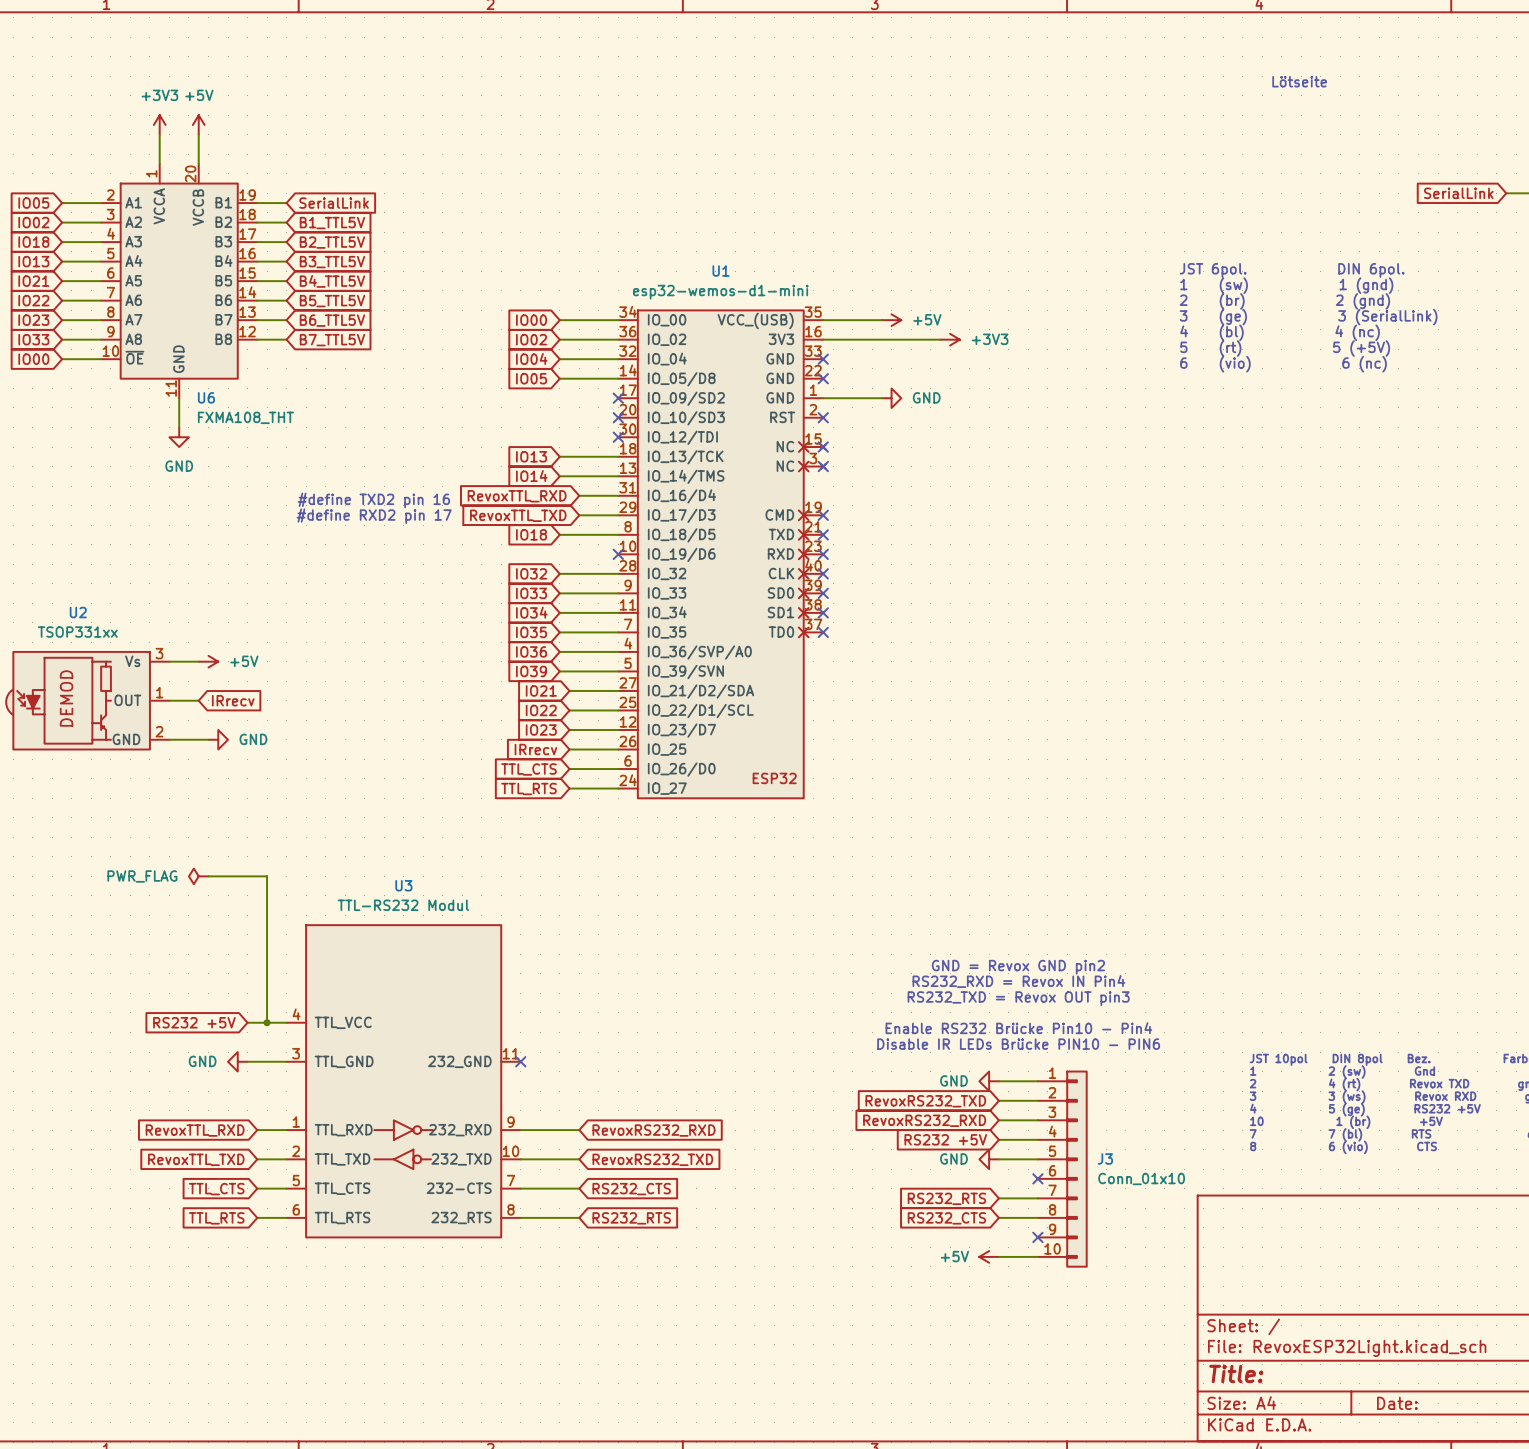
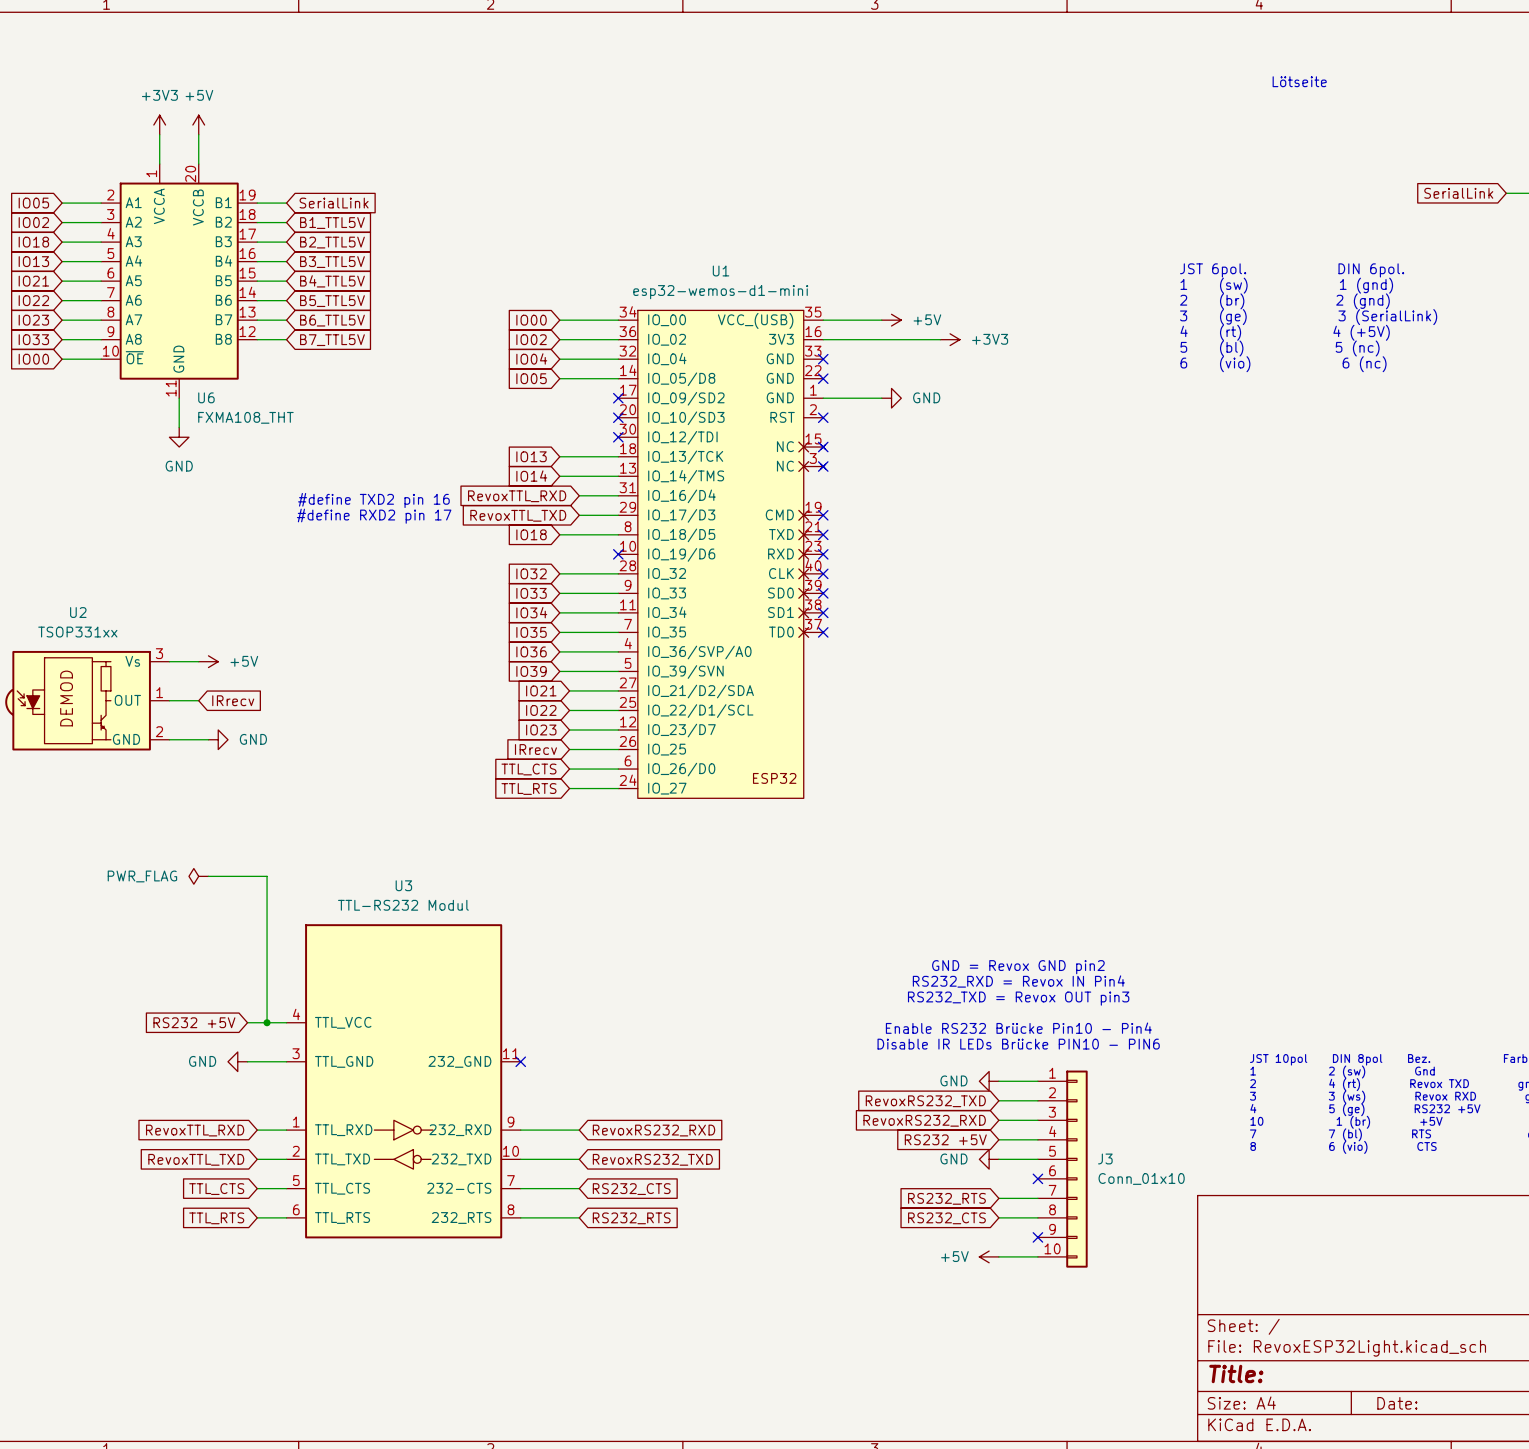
text: 4 (bl) 4 (nc) (1280, 332) -> 4 (rt) 4 (+5V) (1285, 332)
text: 5 (rt) 5 (+5V) (1285, 348) -> 5 (bl) 5 (nc) (1280, 348)

